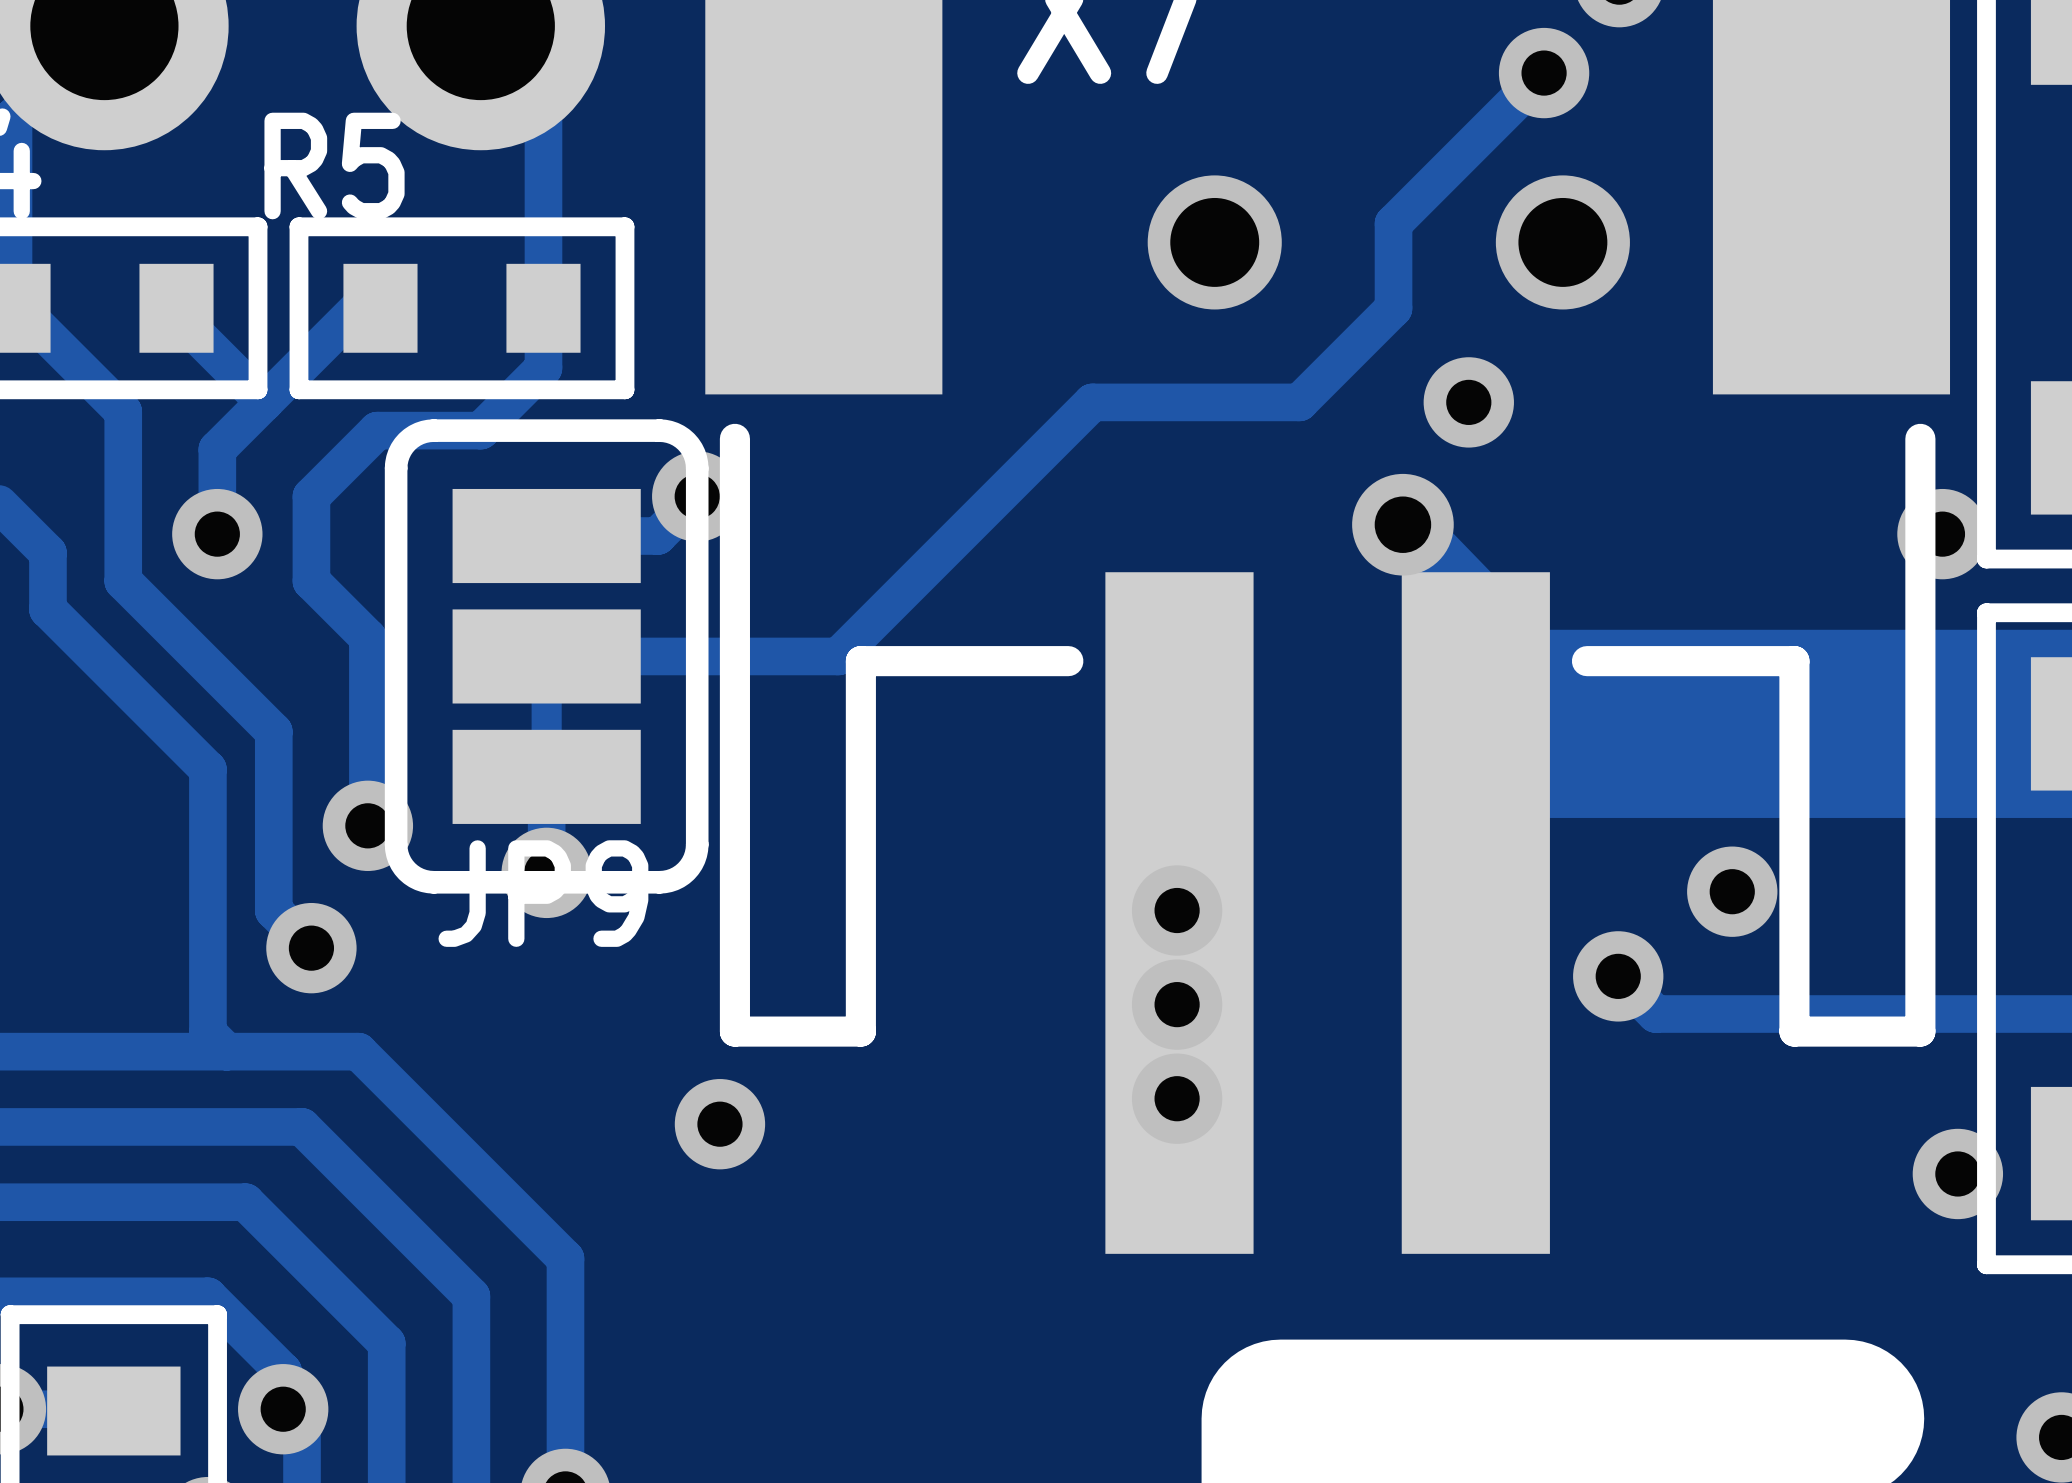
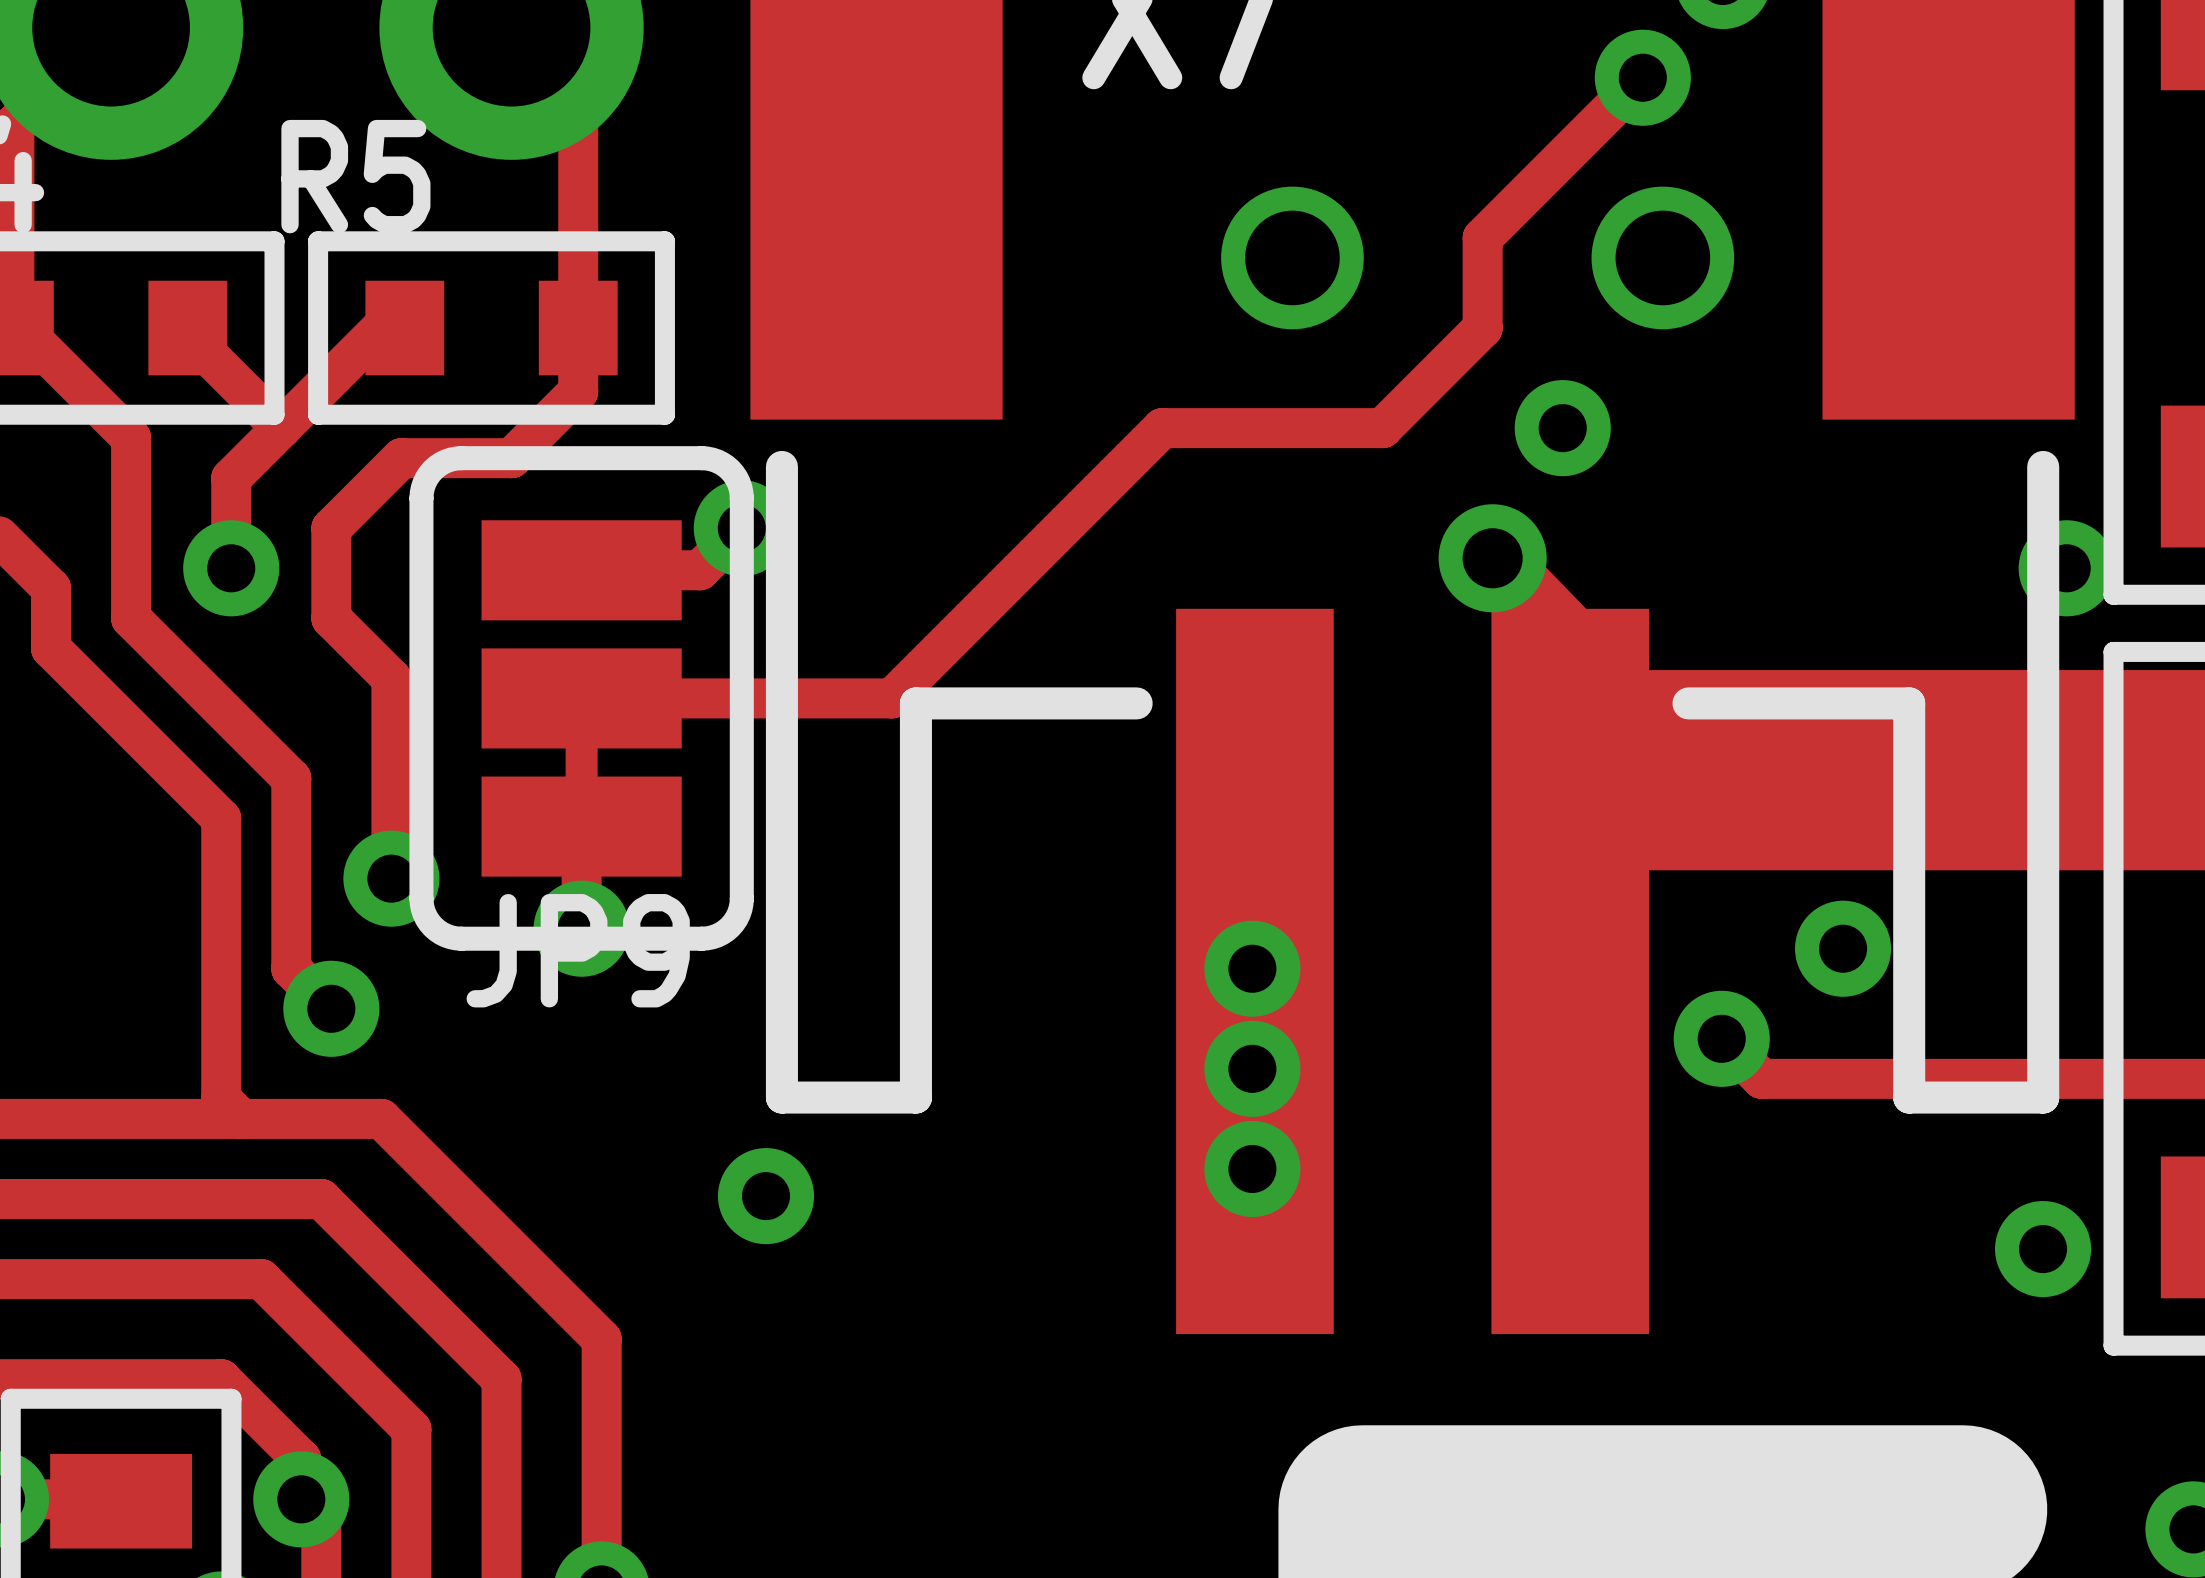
via position: (1957, 1173) -> (2043, 1249)

